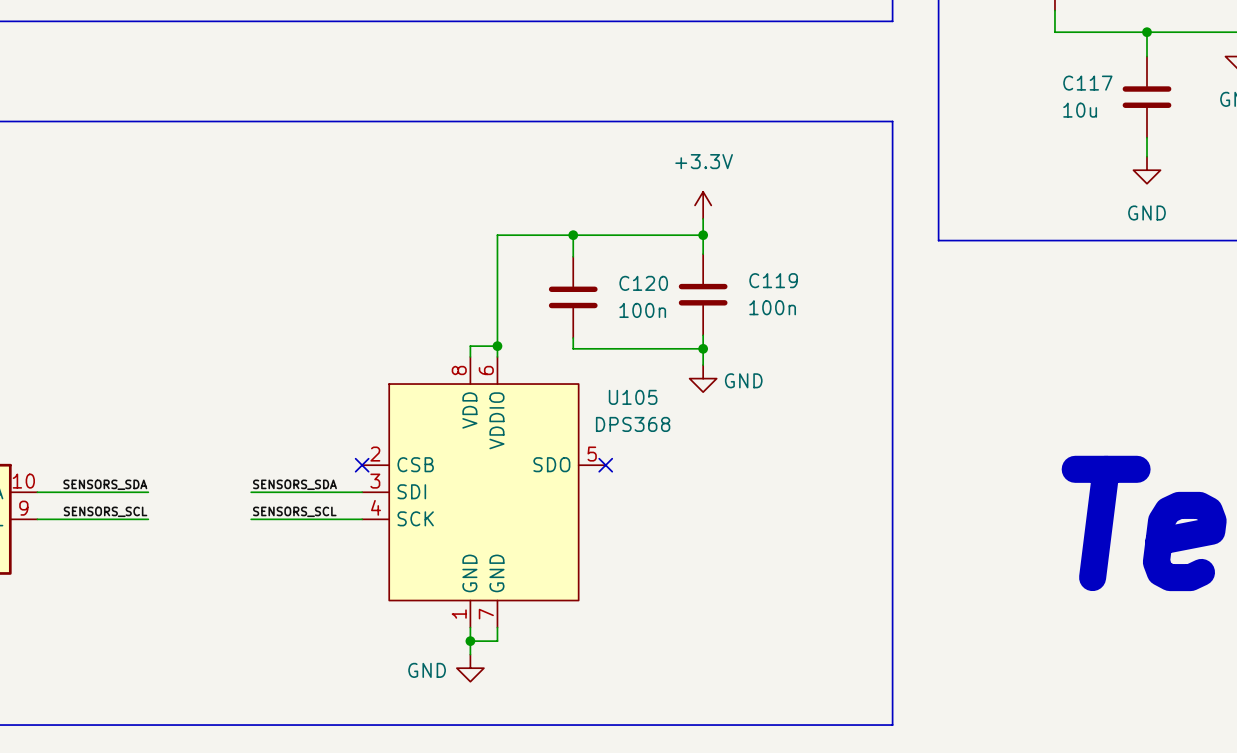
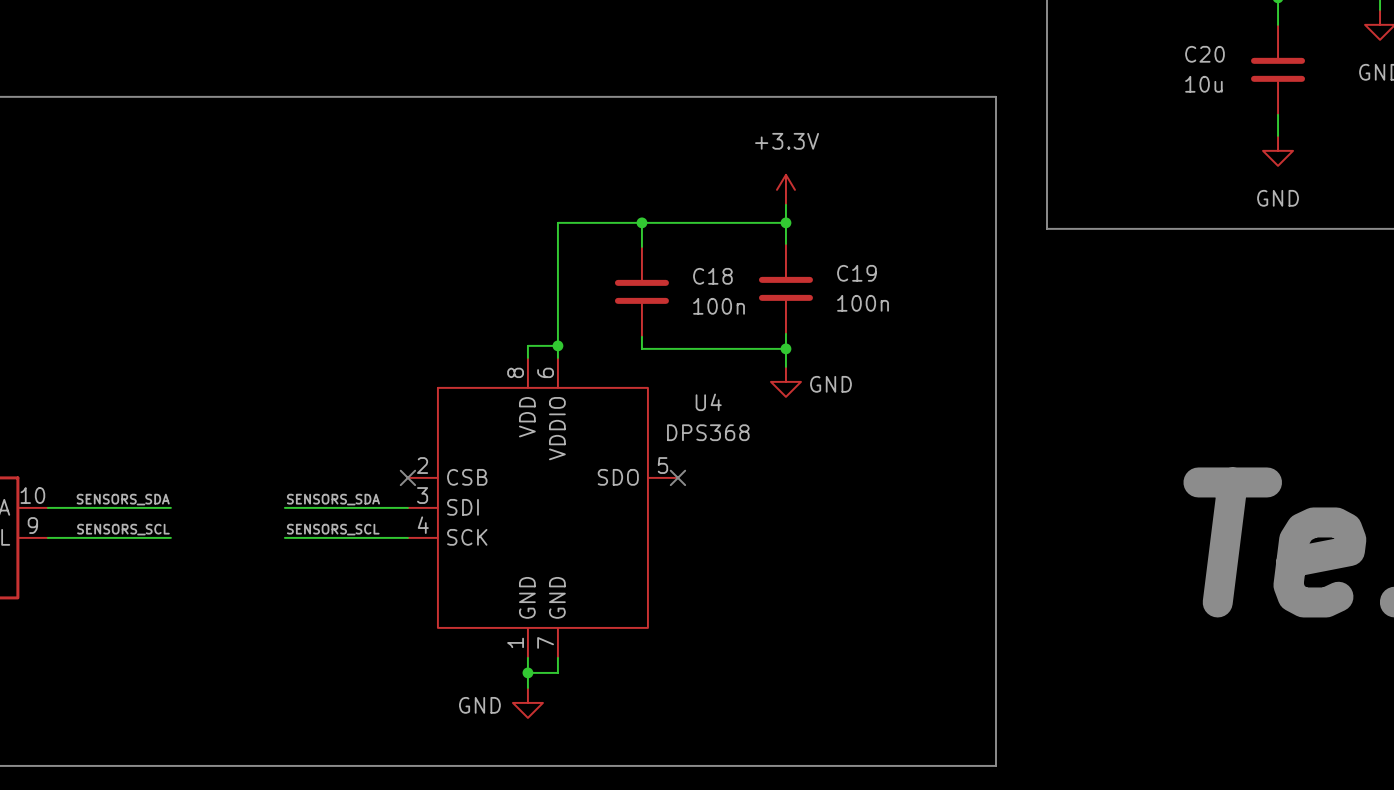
C117 name: C117 (1087, 83) -> C20 (1204, 54)
C119 name: C119 (773, 280) -> C19 (856, 273)
C120 name: C120 (643, 283) -> C18 (712, 276)
U105 name: U105 (633, 397) -> U4 (708, 402)

